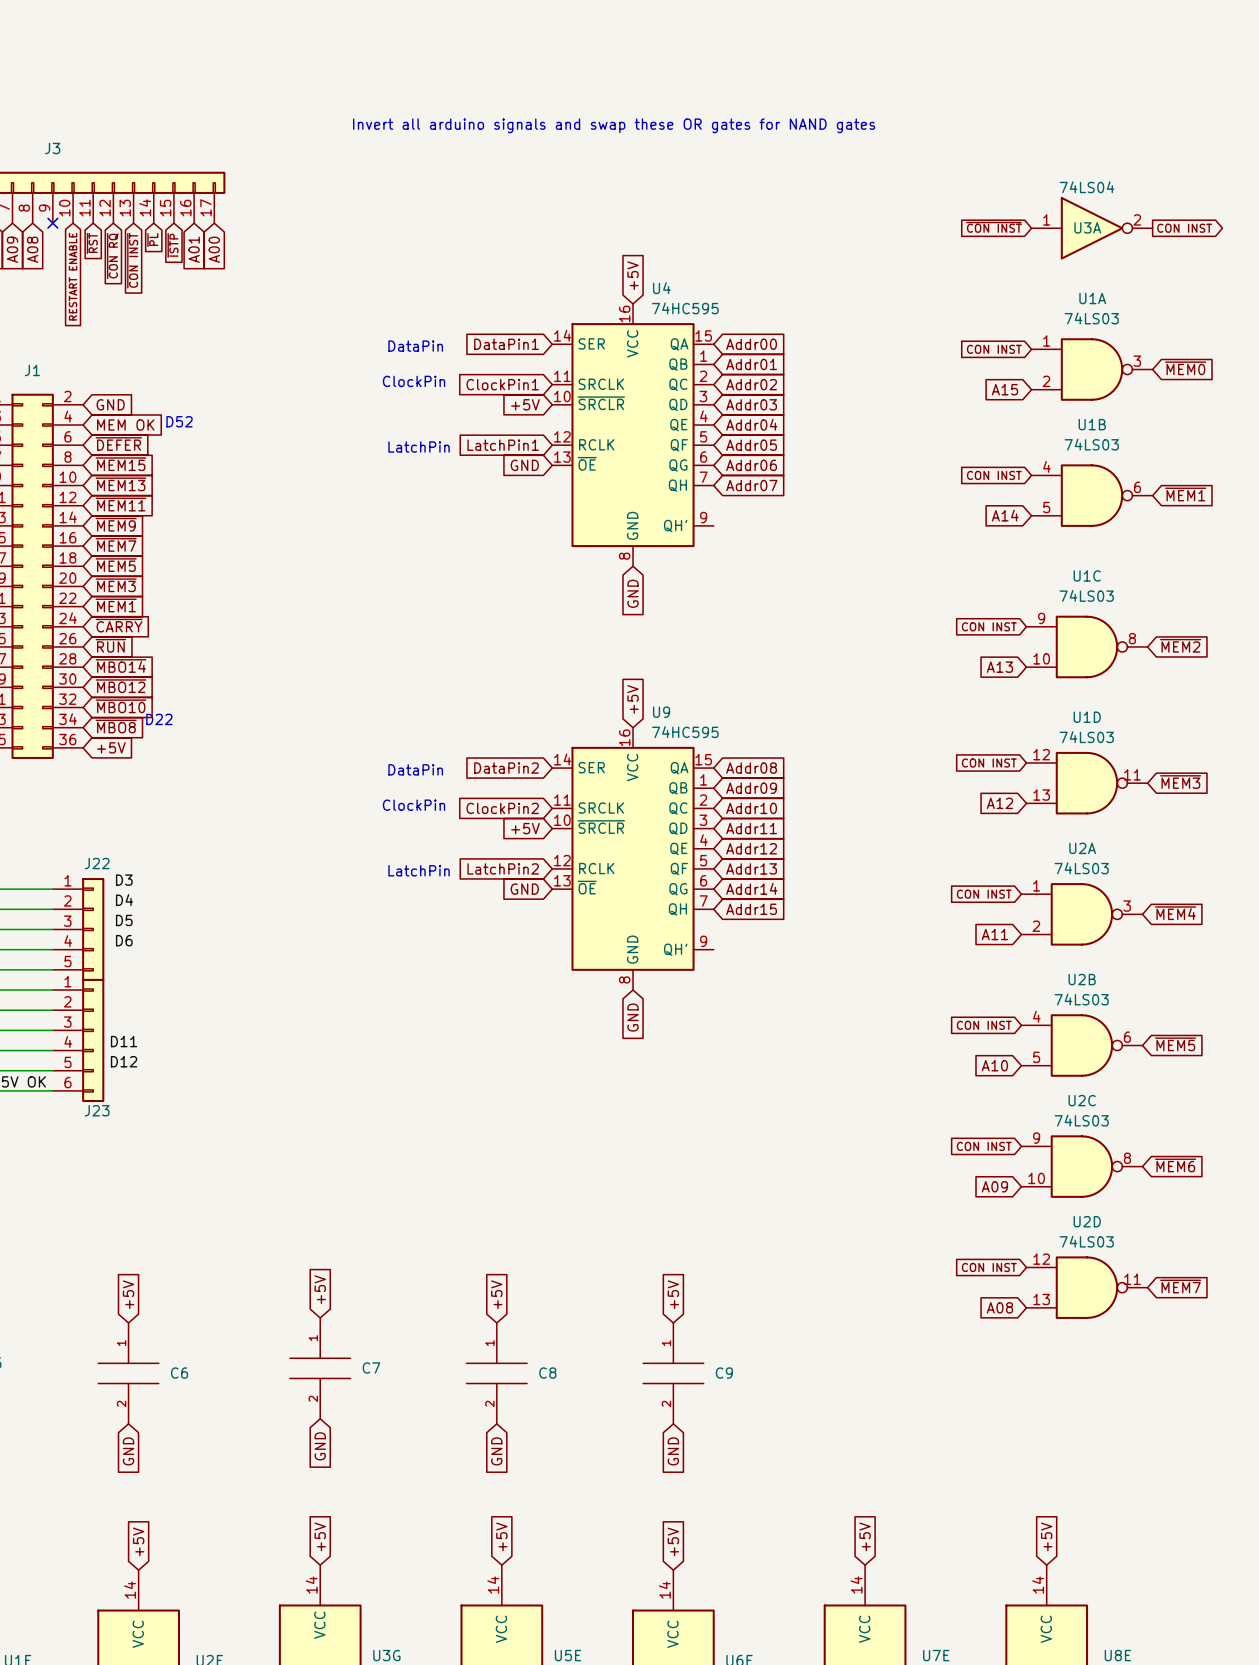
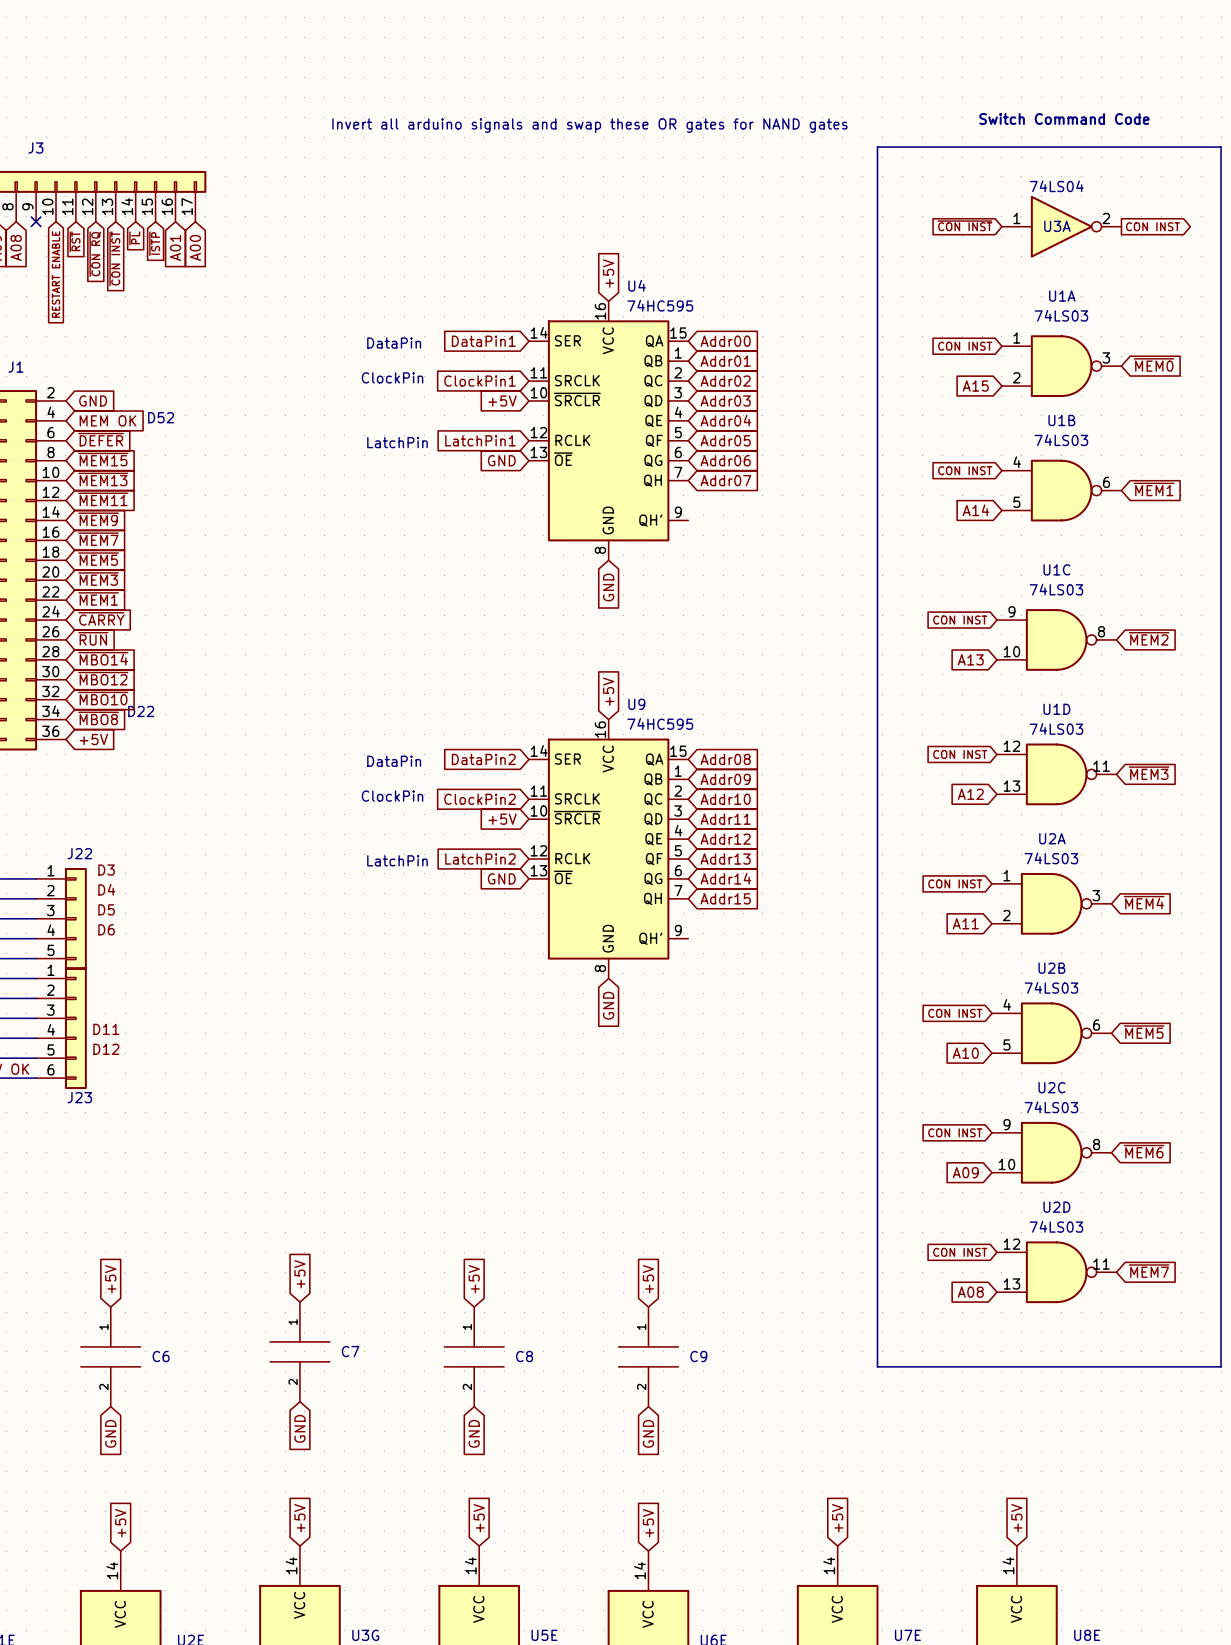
text: none -> Switch Command Code (1064, 118)
line: none -> (877, 147) (1221, 147) (1221, 1366) (877, 1366) (877, 147)

